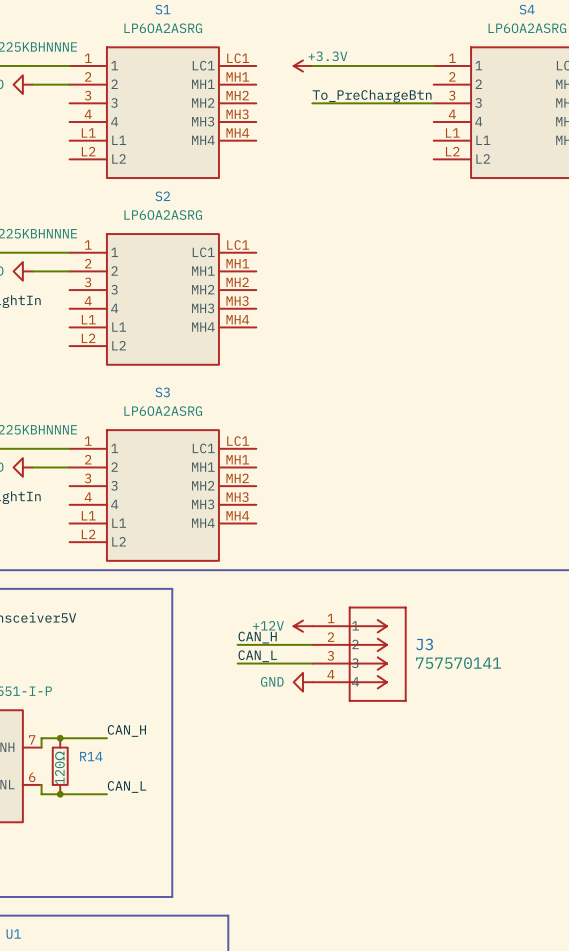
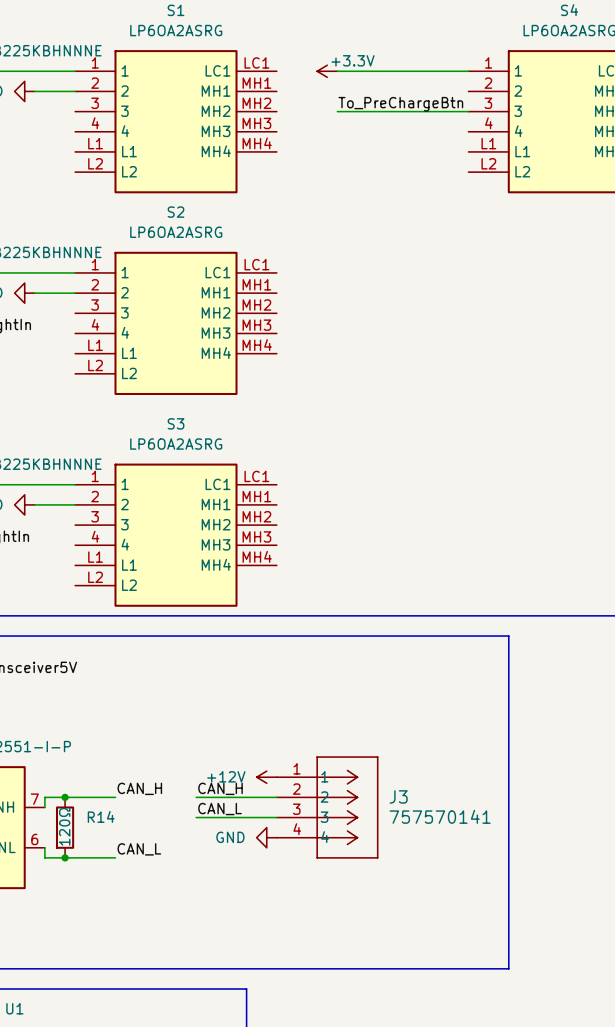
line: (172, 588) (172, 896) -> (186, 636) (508, 636) (508, 968) (186, 968)
power symbol position: +12V (303, 626) -> +12V (266, 777)
label position: CAN_H (257, 637) -> CAN_H (220, 788)
wire: (237, 644) (312, 644) -> (196, 817) (276, 817)
J3 position: (359, 654) -> (327, 807)
label position: CAN_L (257, 656) -> CAN_L (220, 809)
wire: (237, 663) (312, 663) -> (196, 797) (276, 797)
power symbol position: GND (303, 682) -> GND (266, 837)

